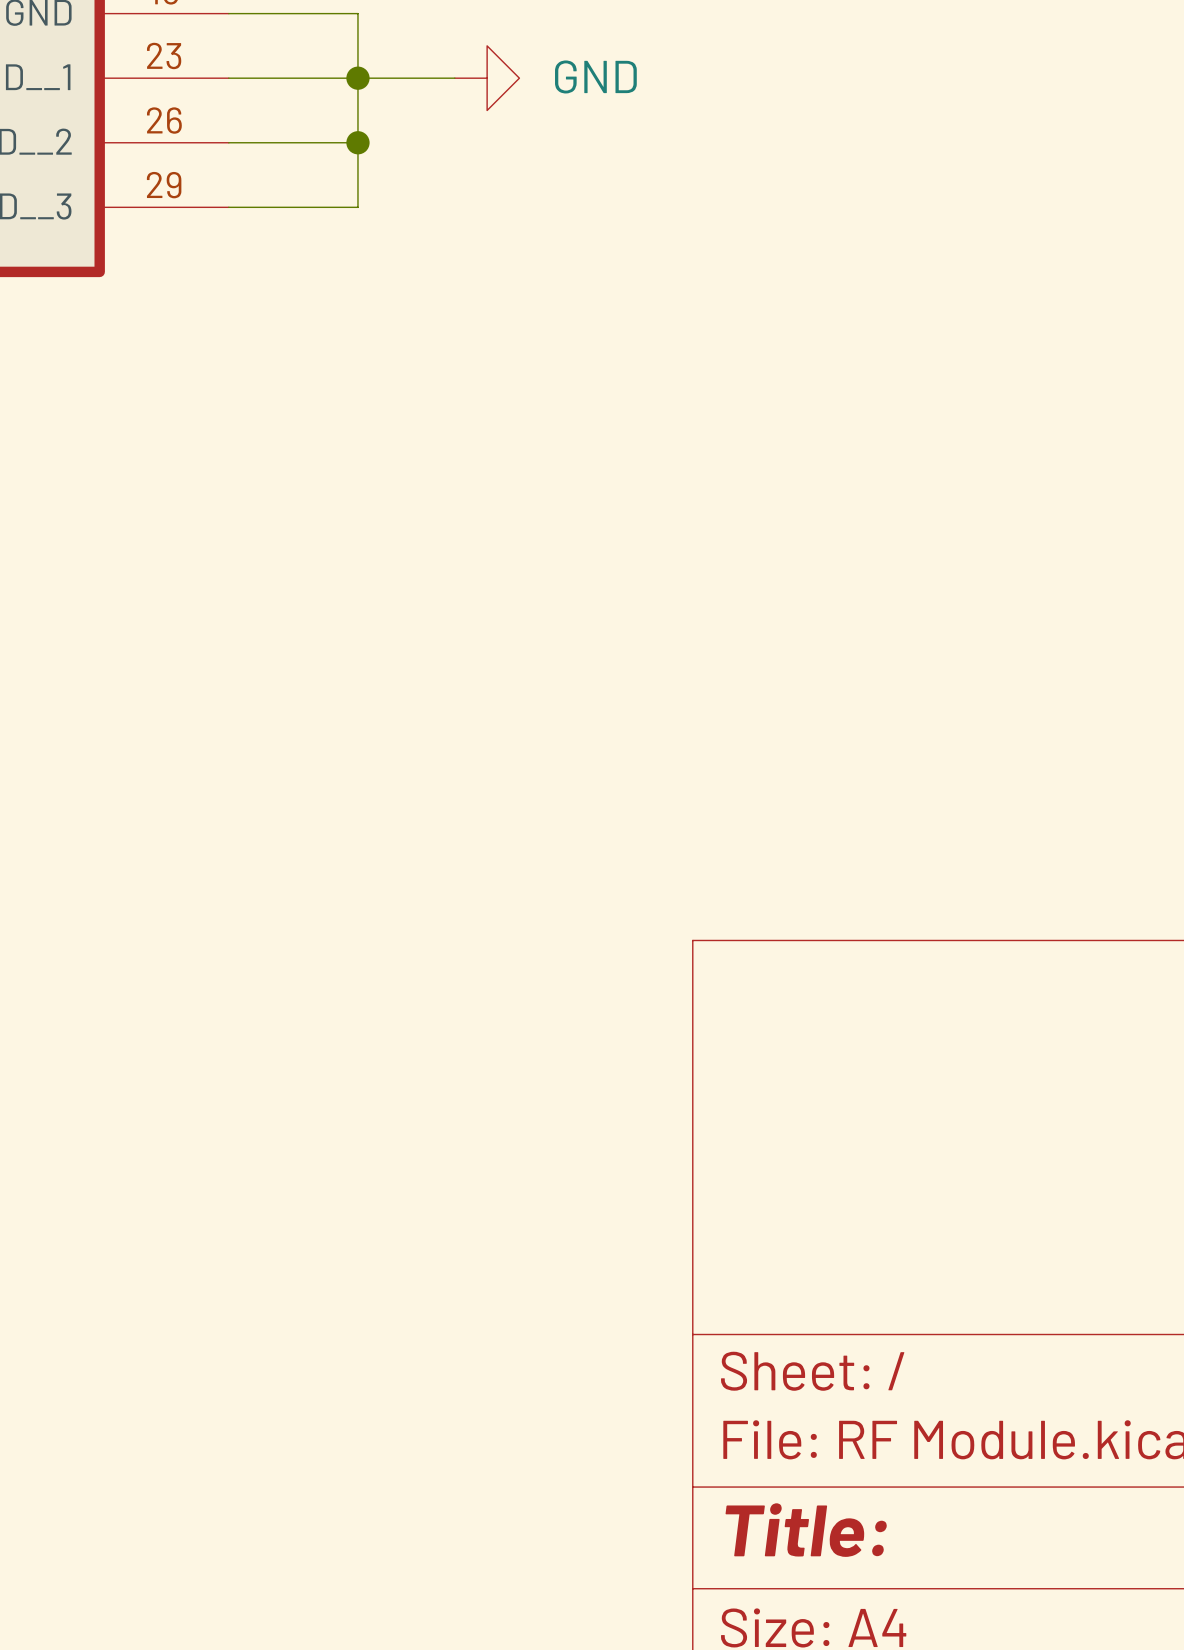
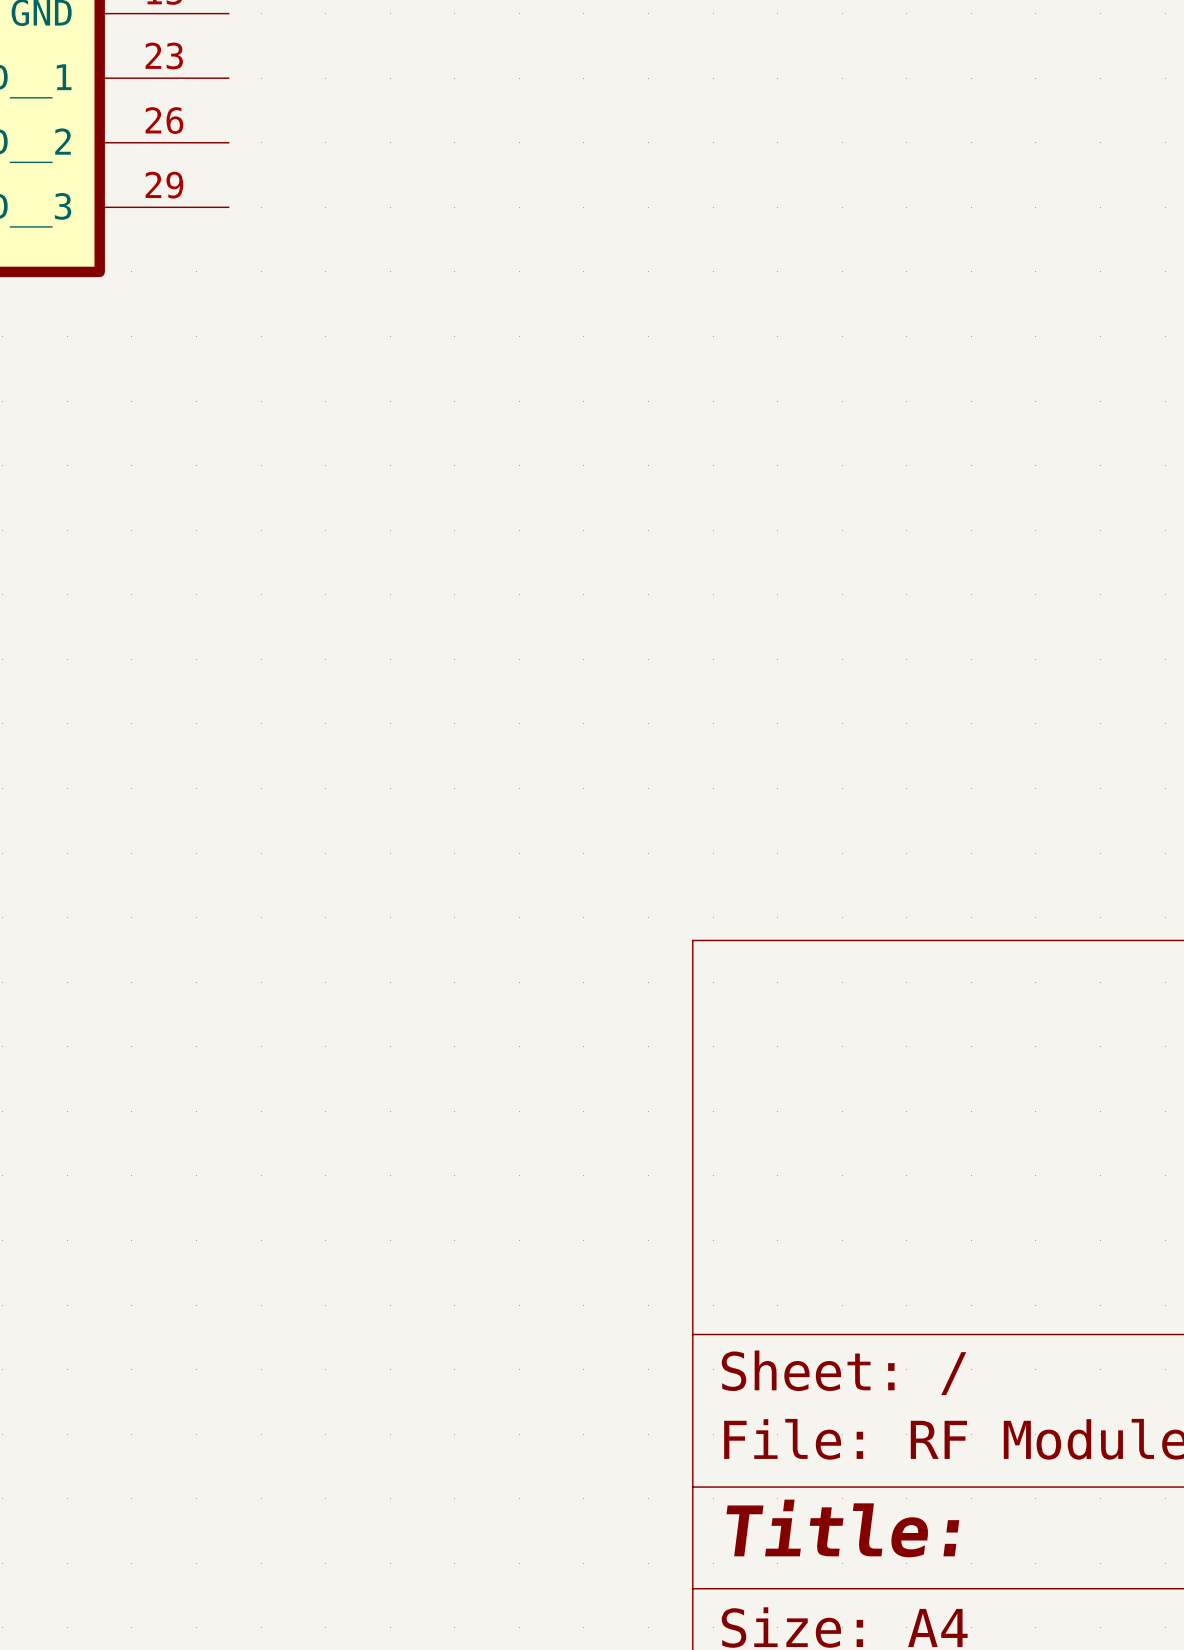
wire: (228, 13) (357, 13) (357, 207) (228, 207) -> none
wire: (228, 78) (454, 78) -> none
junction: (357, 78) -> none
power symbol: GND (487, 78) -> none
wire: (228, 142) (357, 142) -> none
junction: (357, 142) -> none

